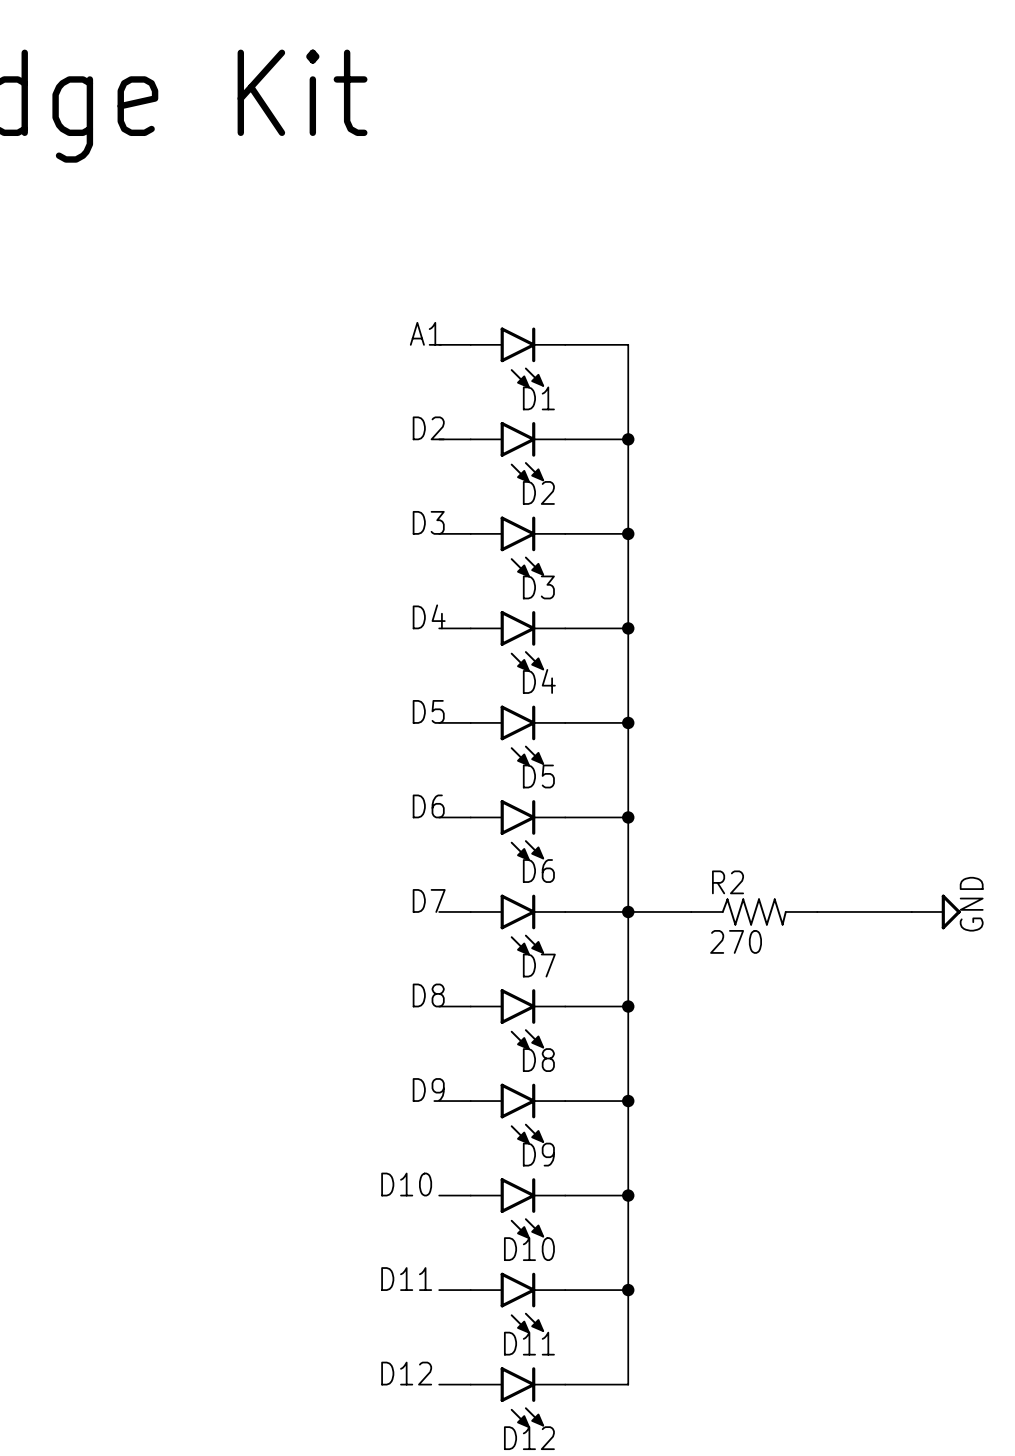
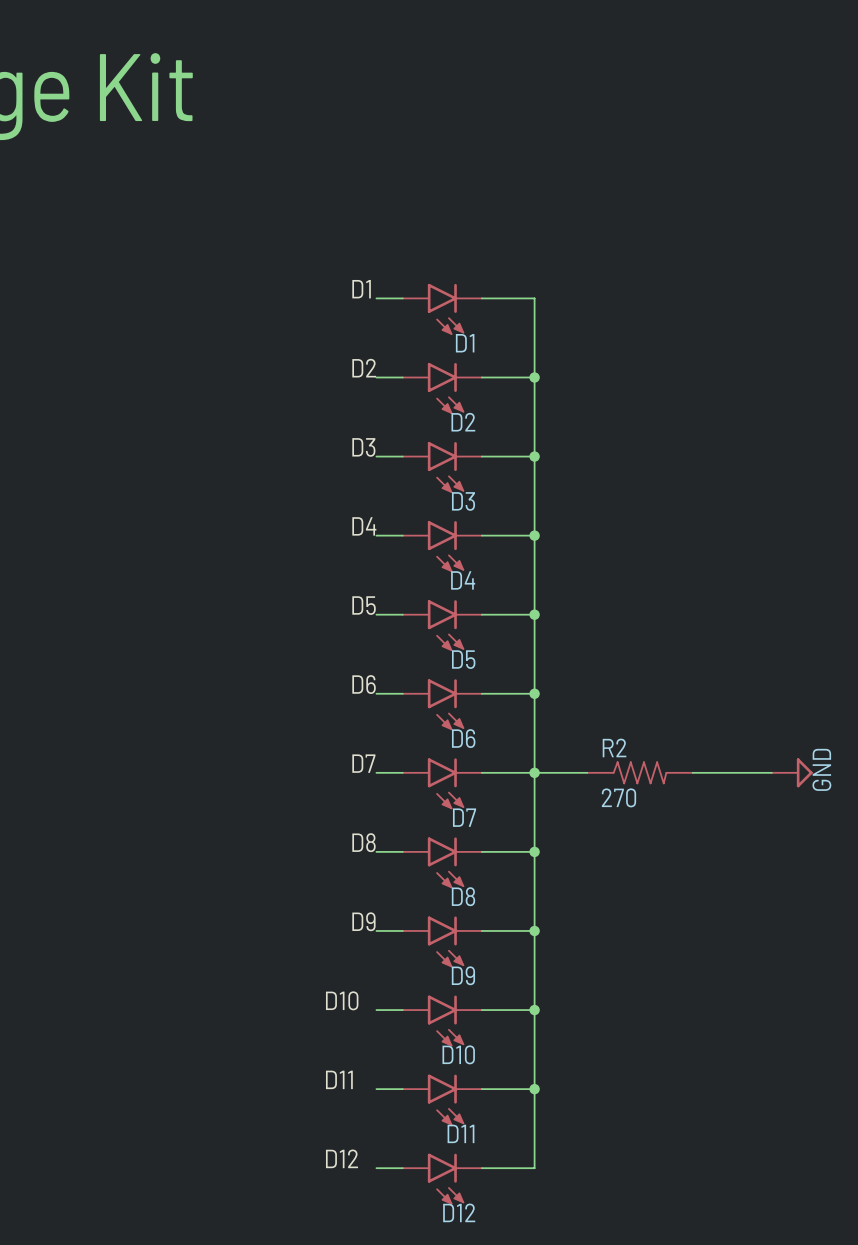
label: A1 (425, 333) -> D1 (361, 289)

